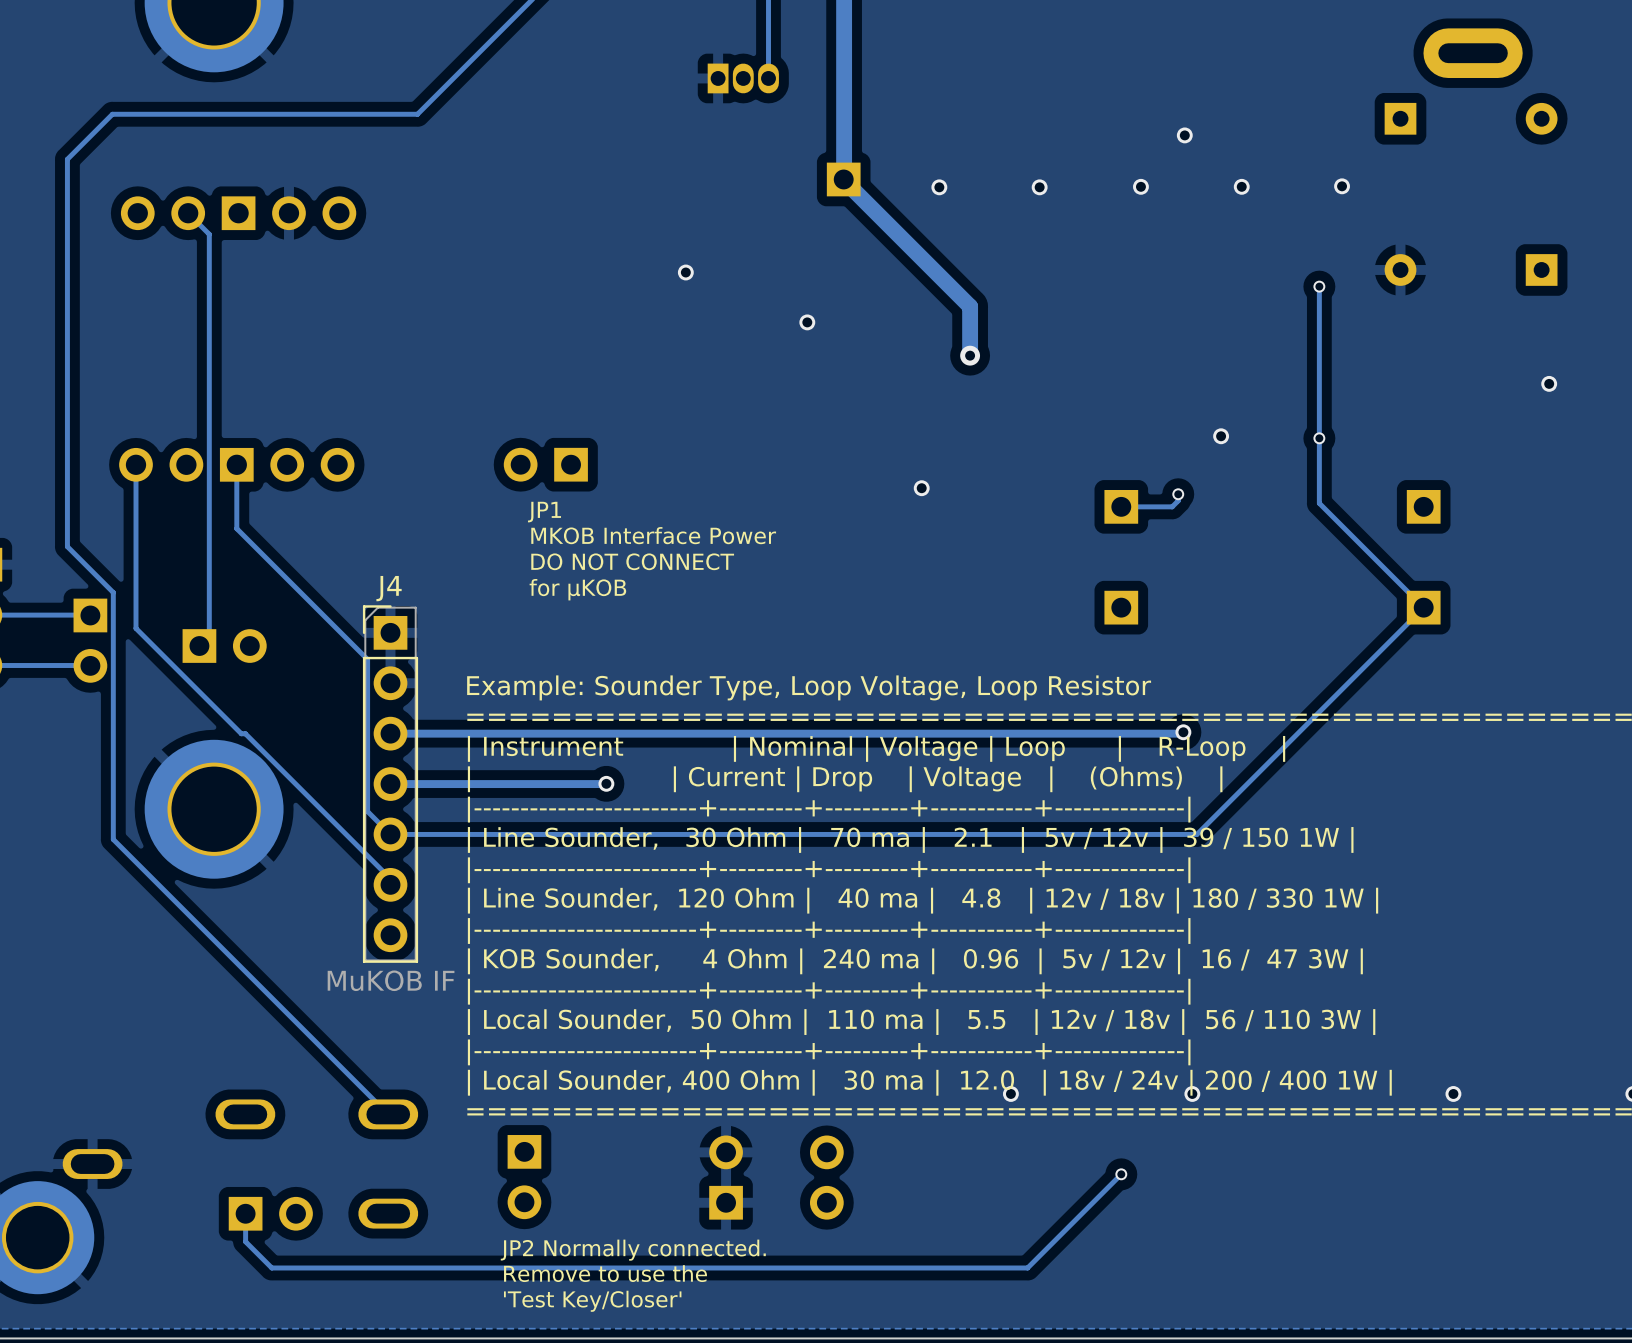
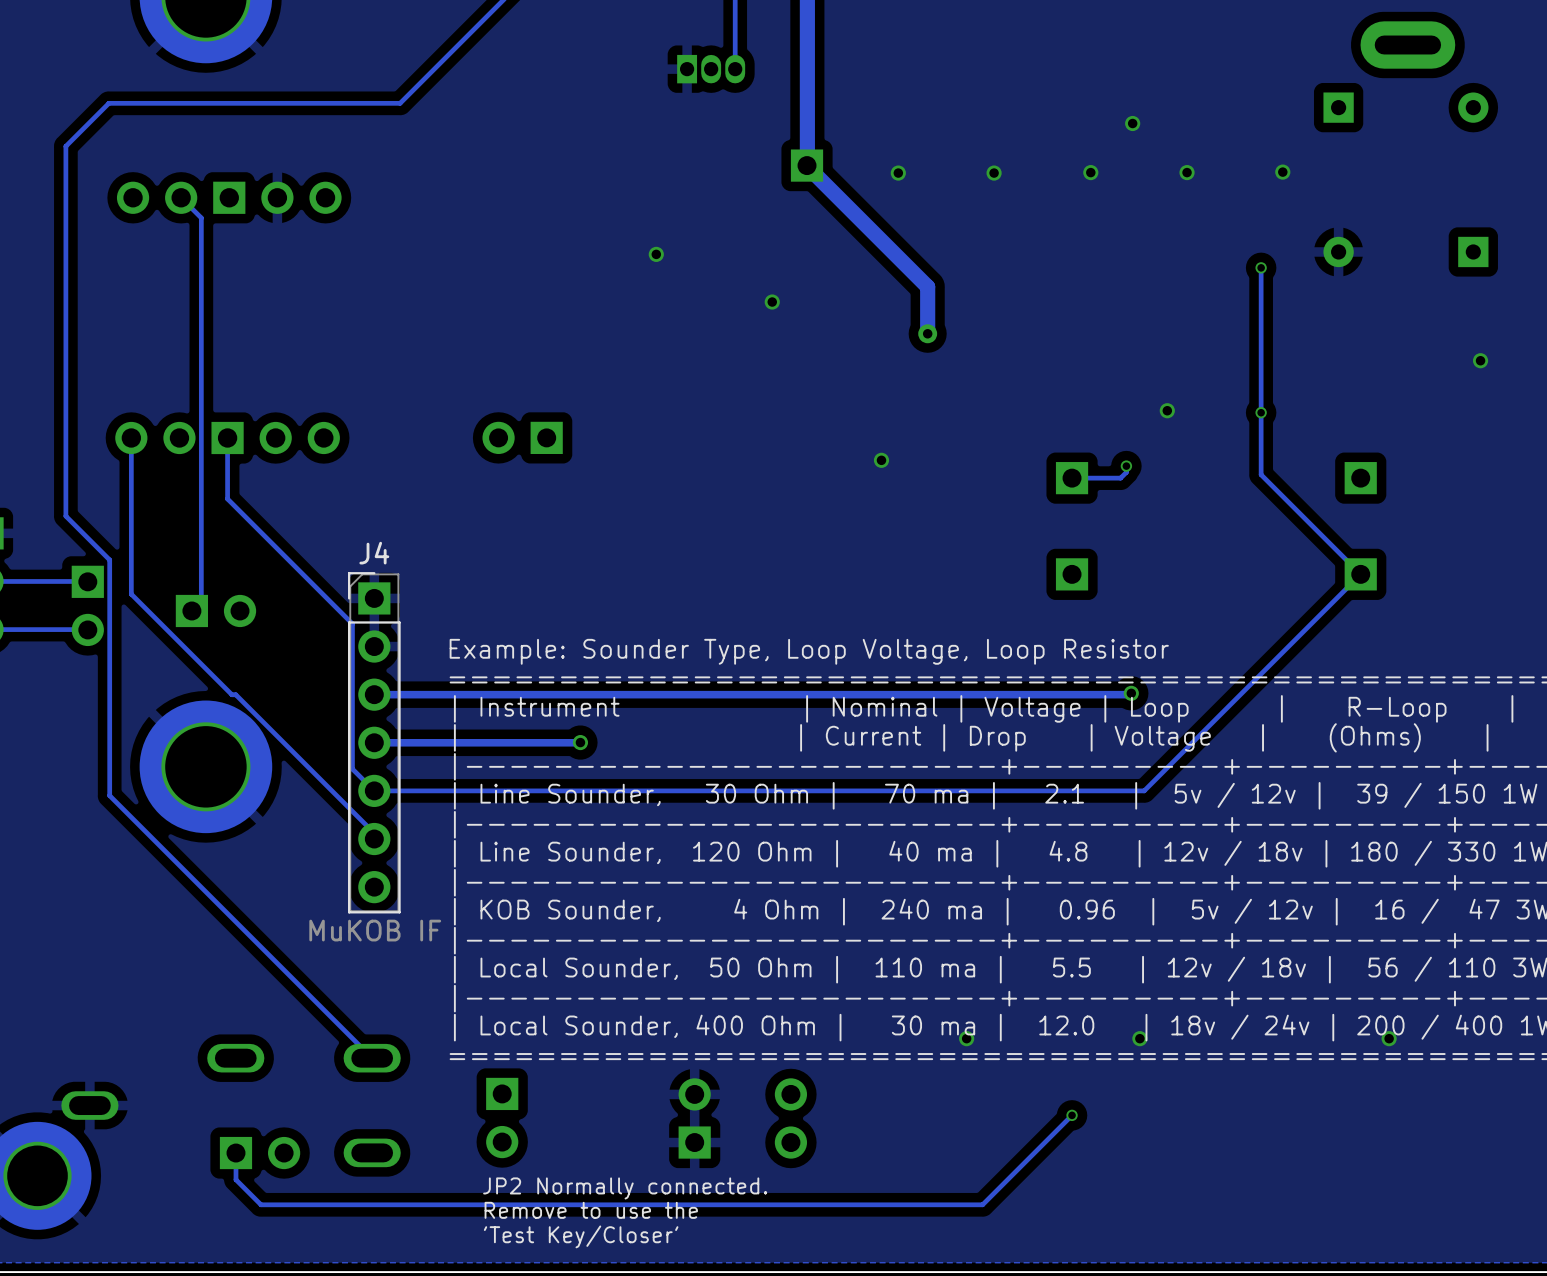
text: JP1 (544, 512) -> none
text: MKOB Interface Power (653, 535) -> none
text: DO NOT CONNECT (632, 561) -> none
text: for μKOB (577, 589) -> none

